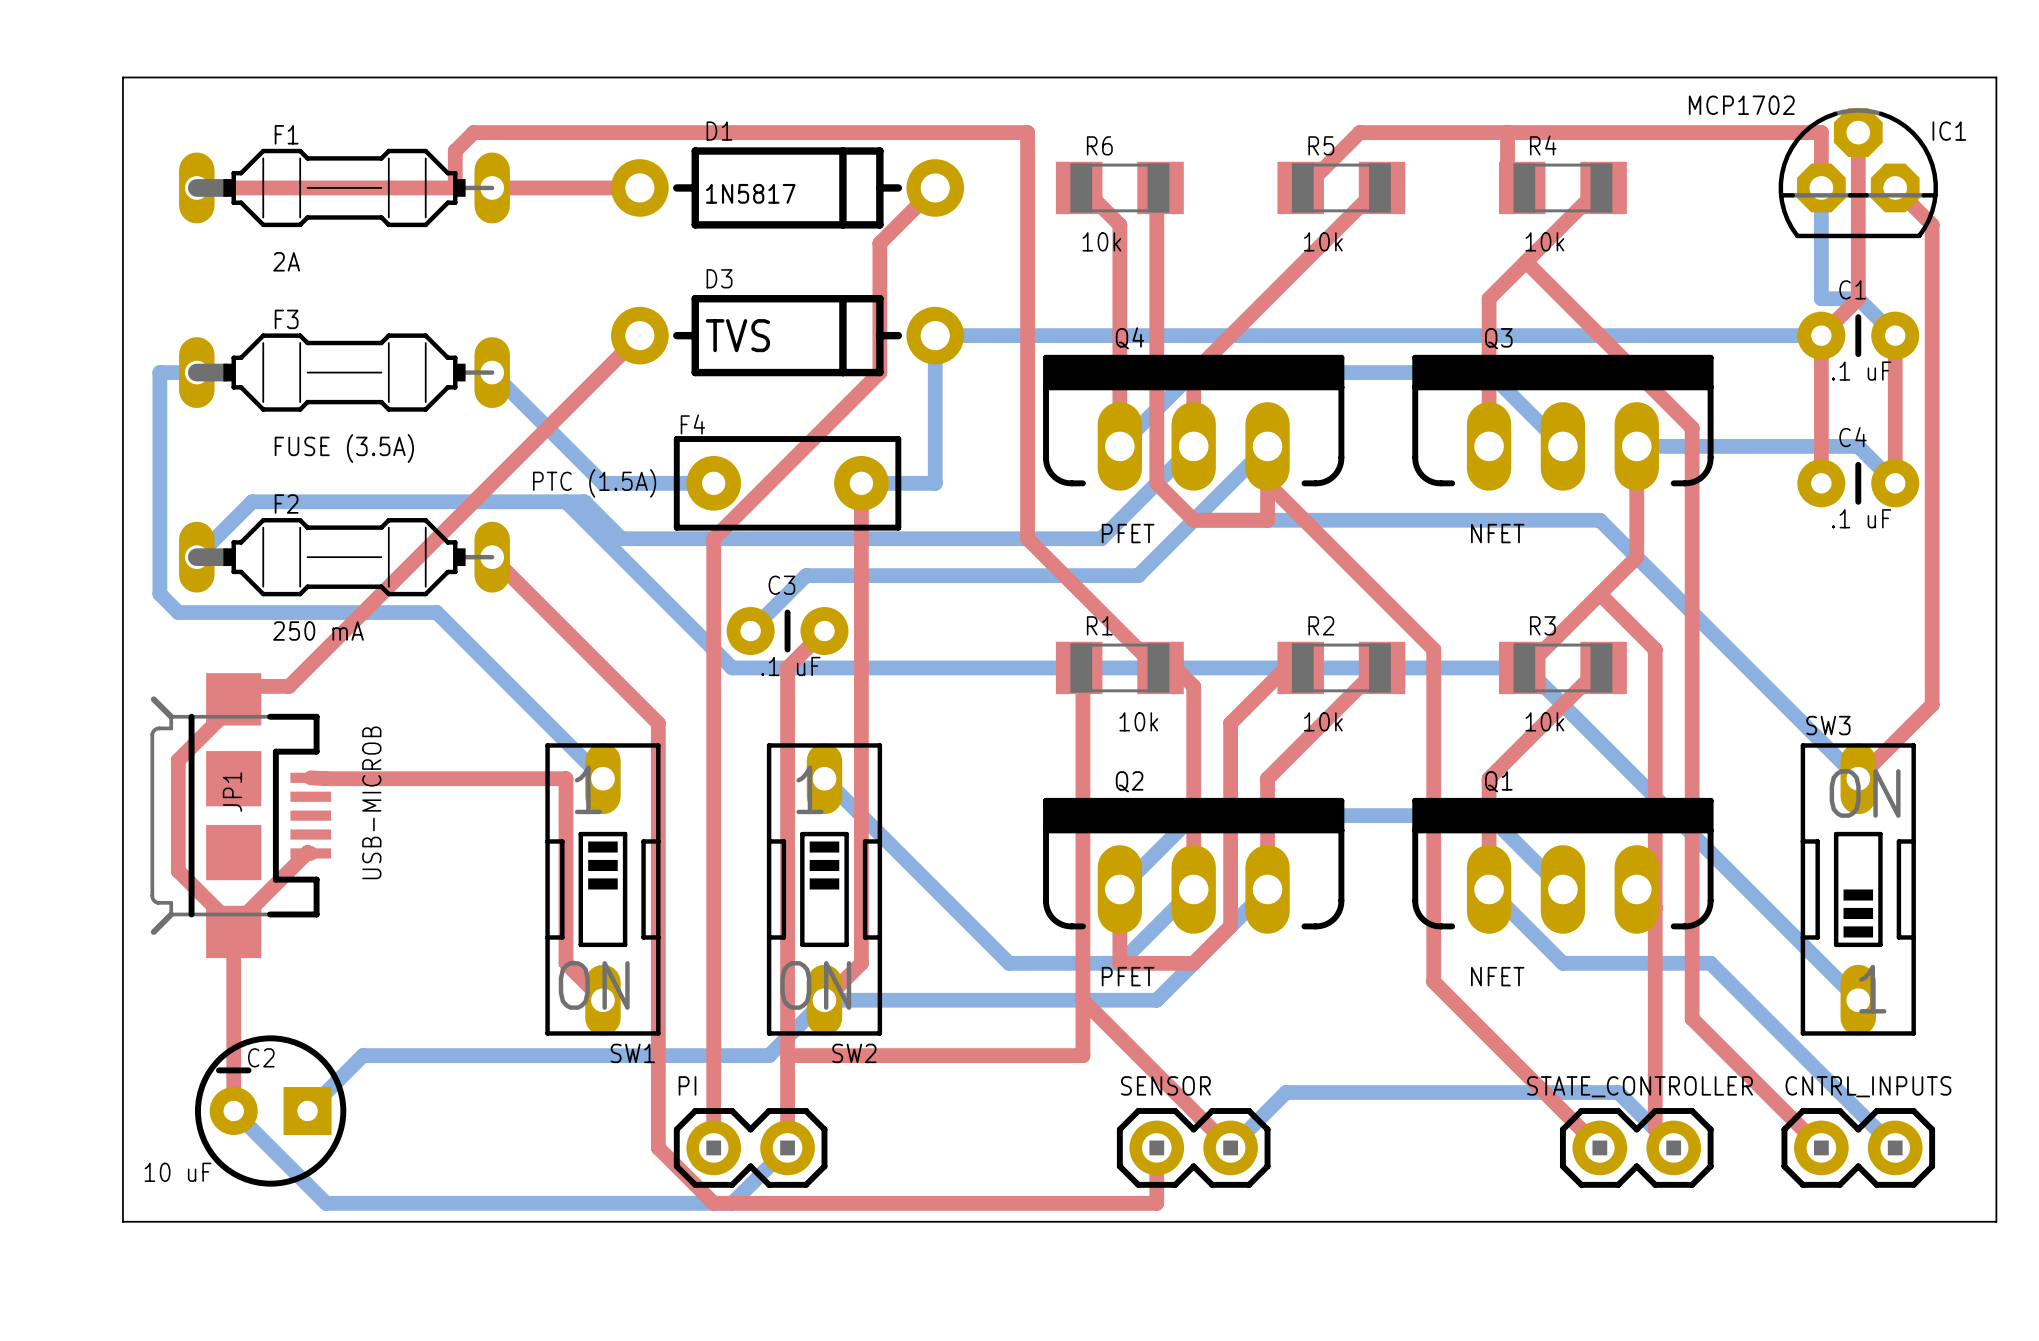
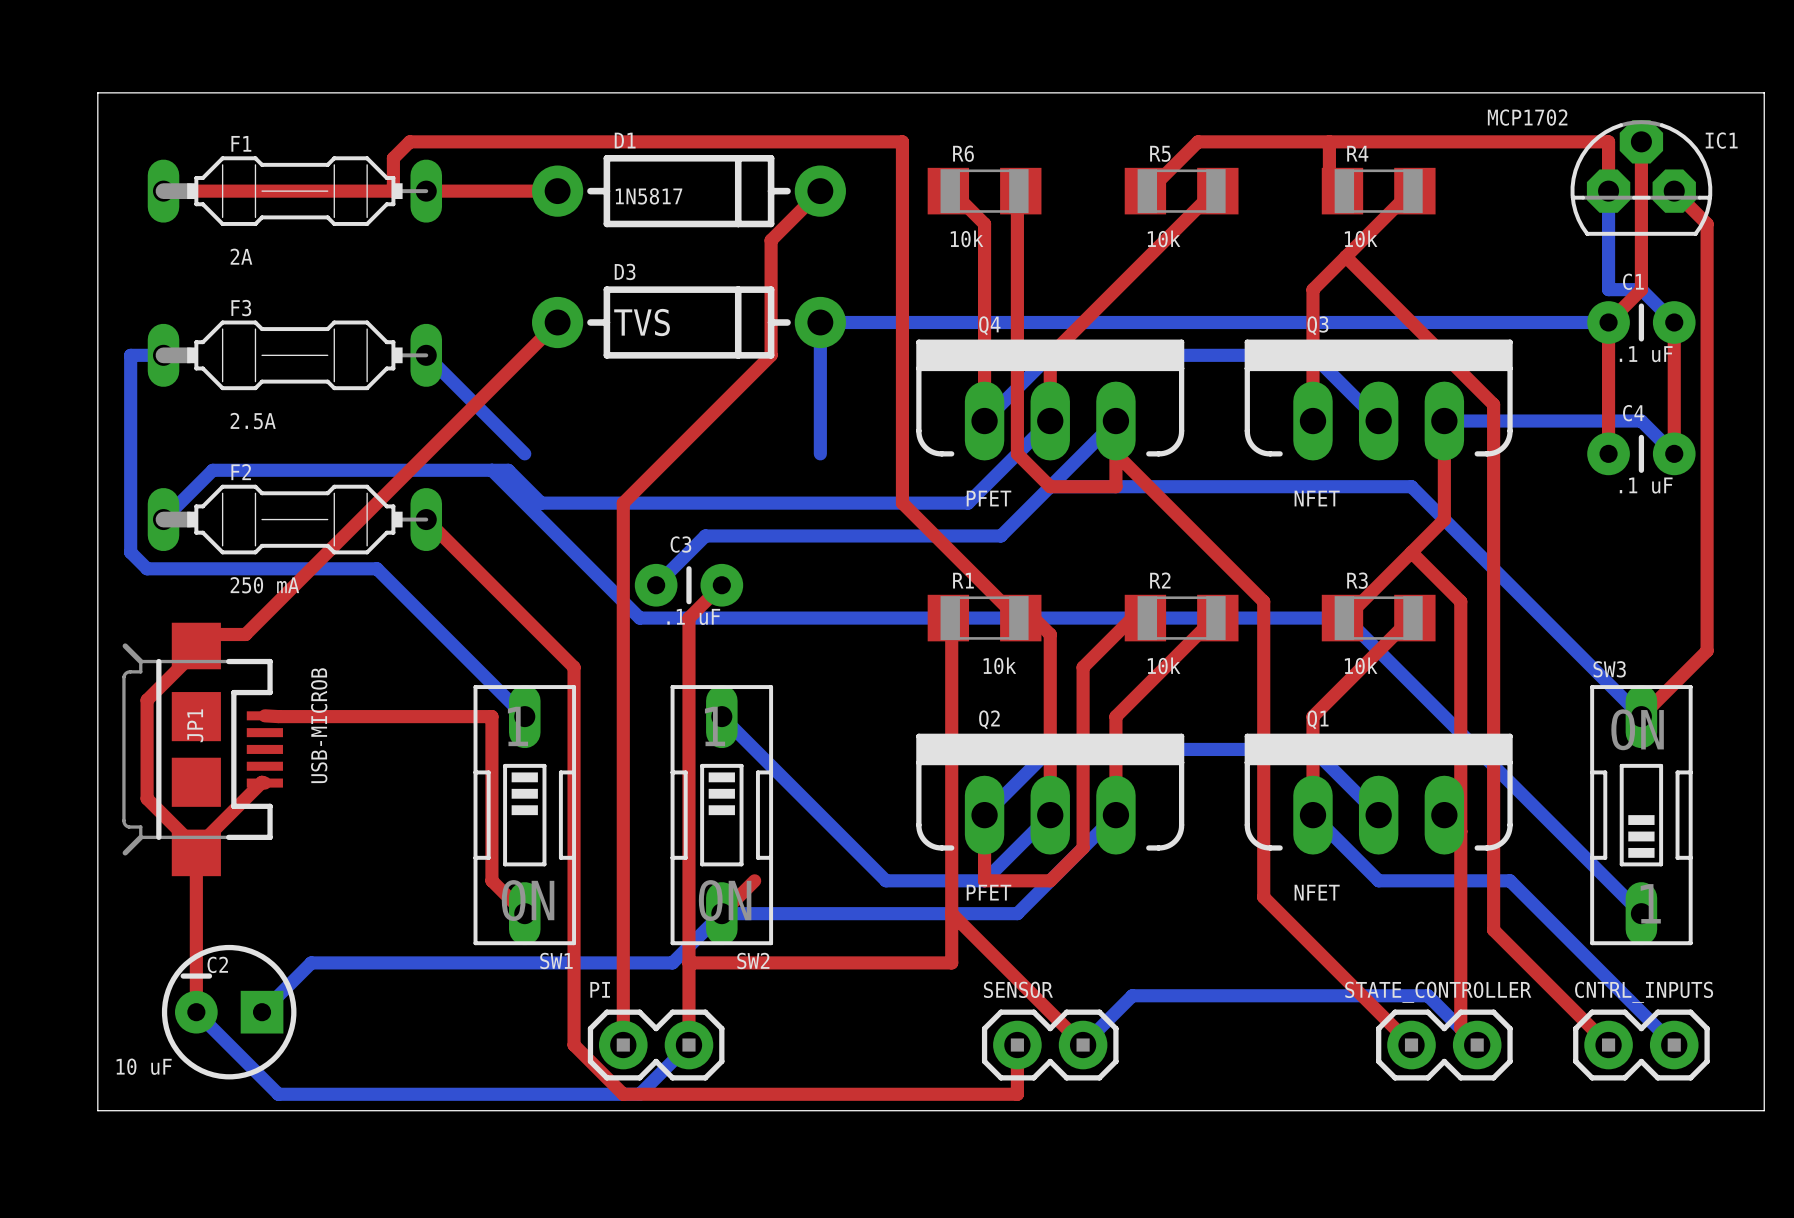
F3 value: FUSE (3.5A) (344, 448) -> 2.5A (253, 421)
bottom track: (602, 483) (713, 483) -> none
F4: PTC (1.5A) (787, 483) -> none
top track: (861, 483) (861, 963) -> none
bottom track: (861, 483) (935, 483) -> none

